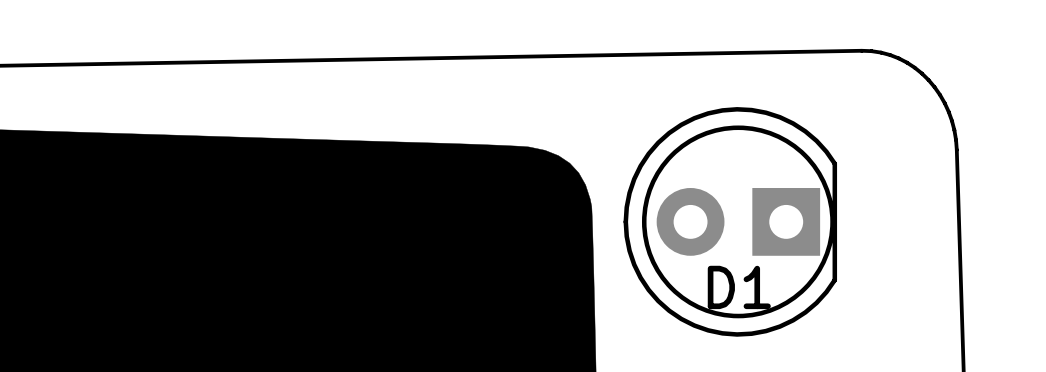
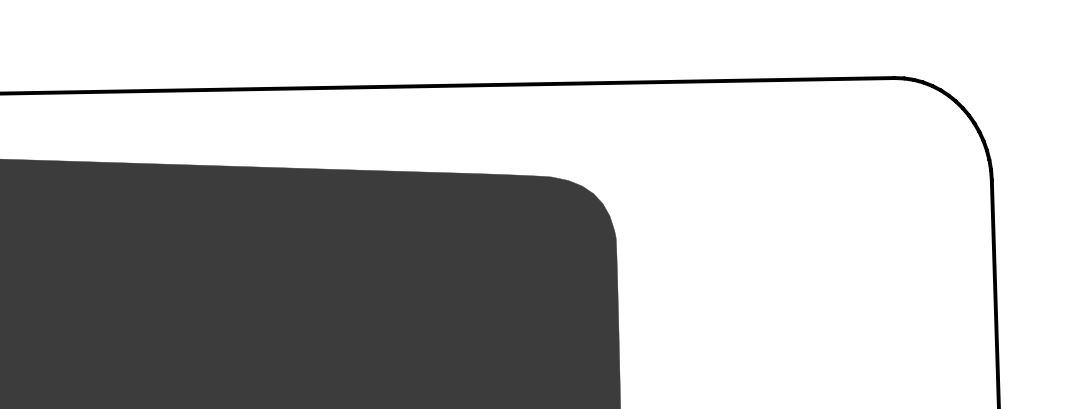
D1: (730, 221) -> none

